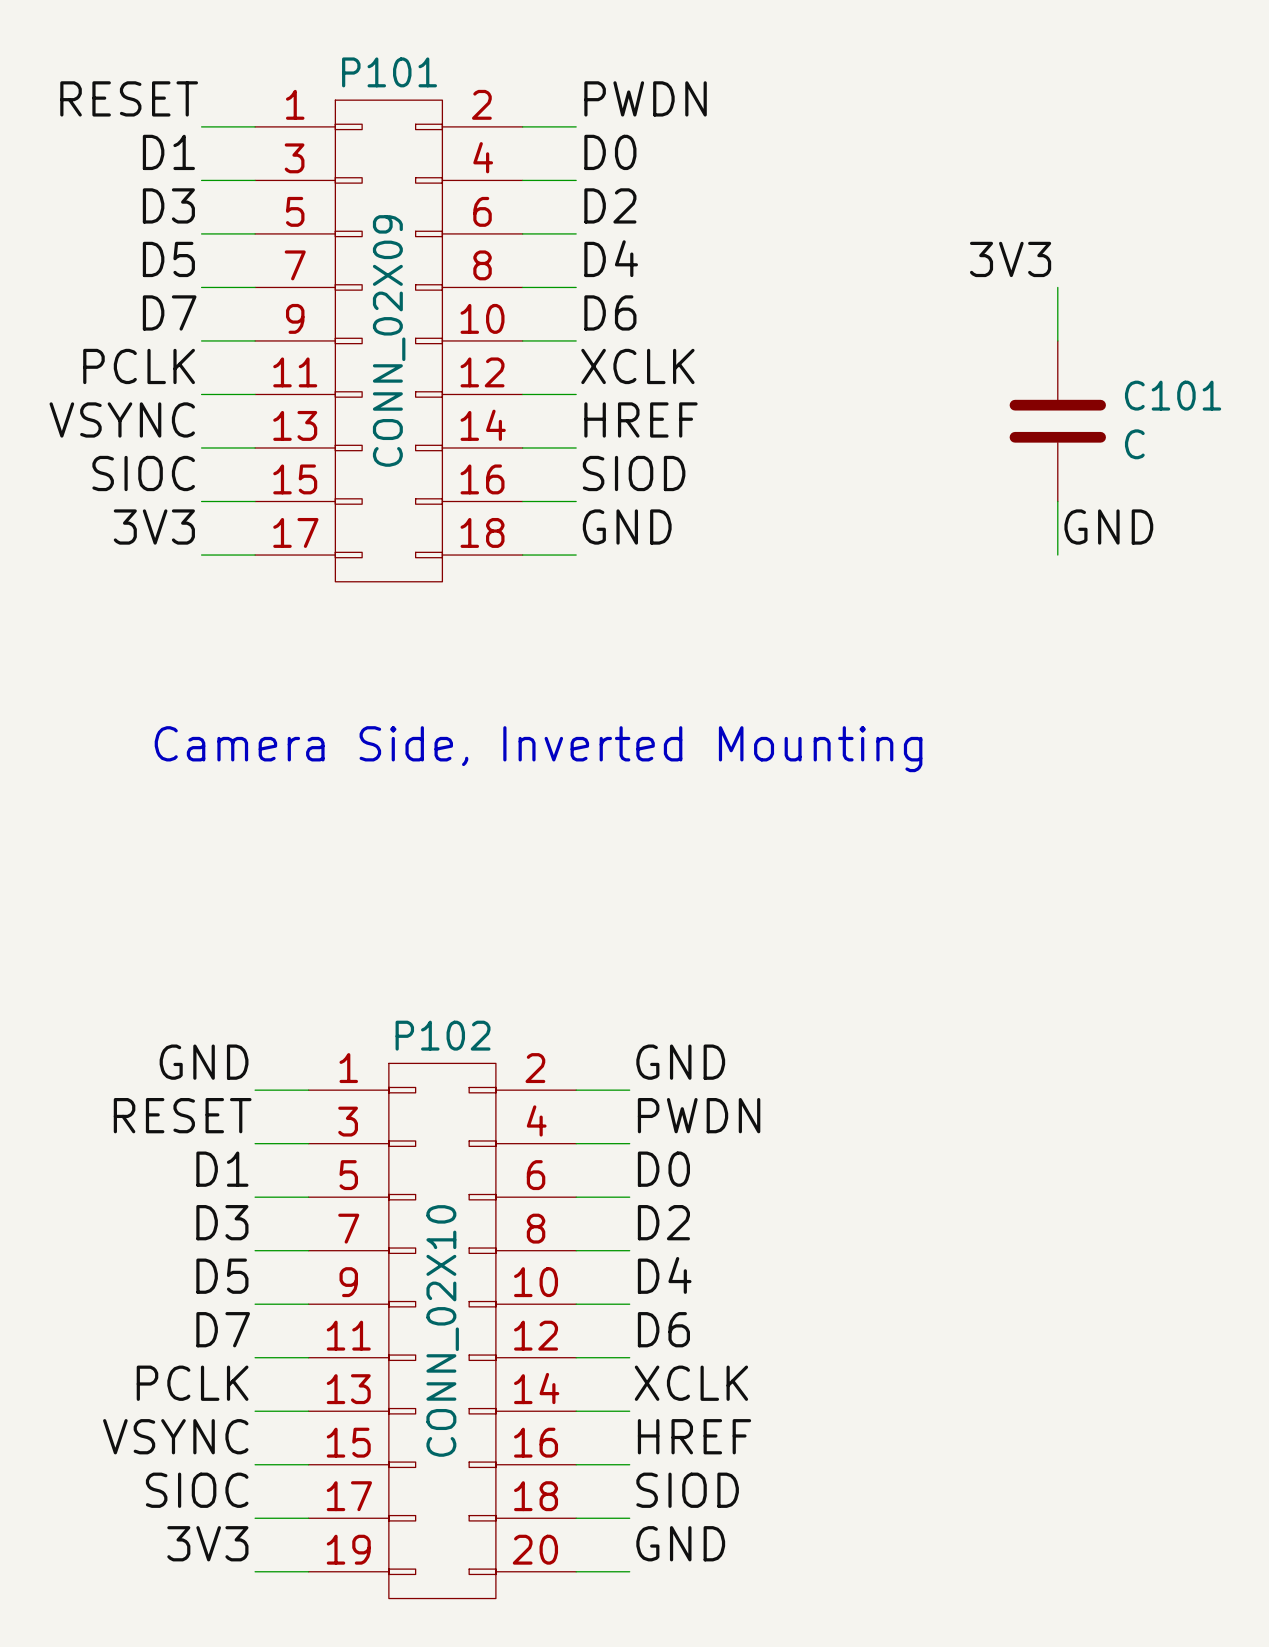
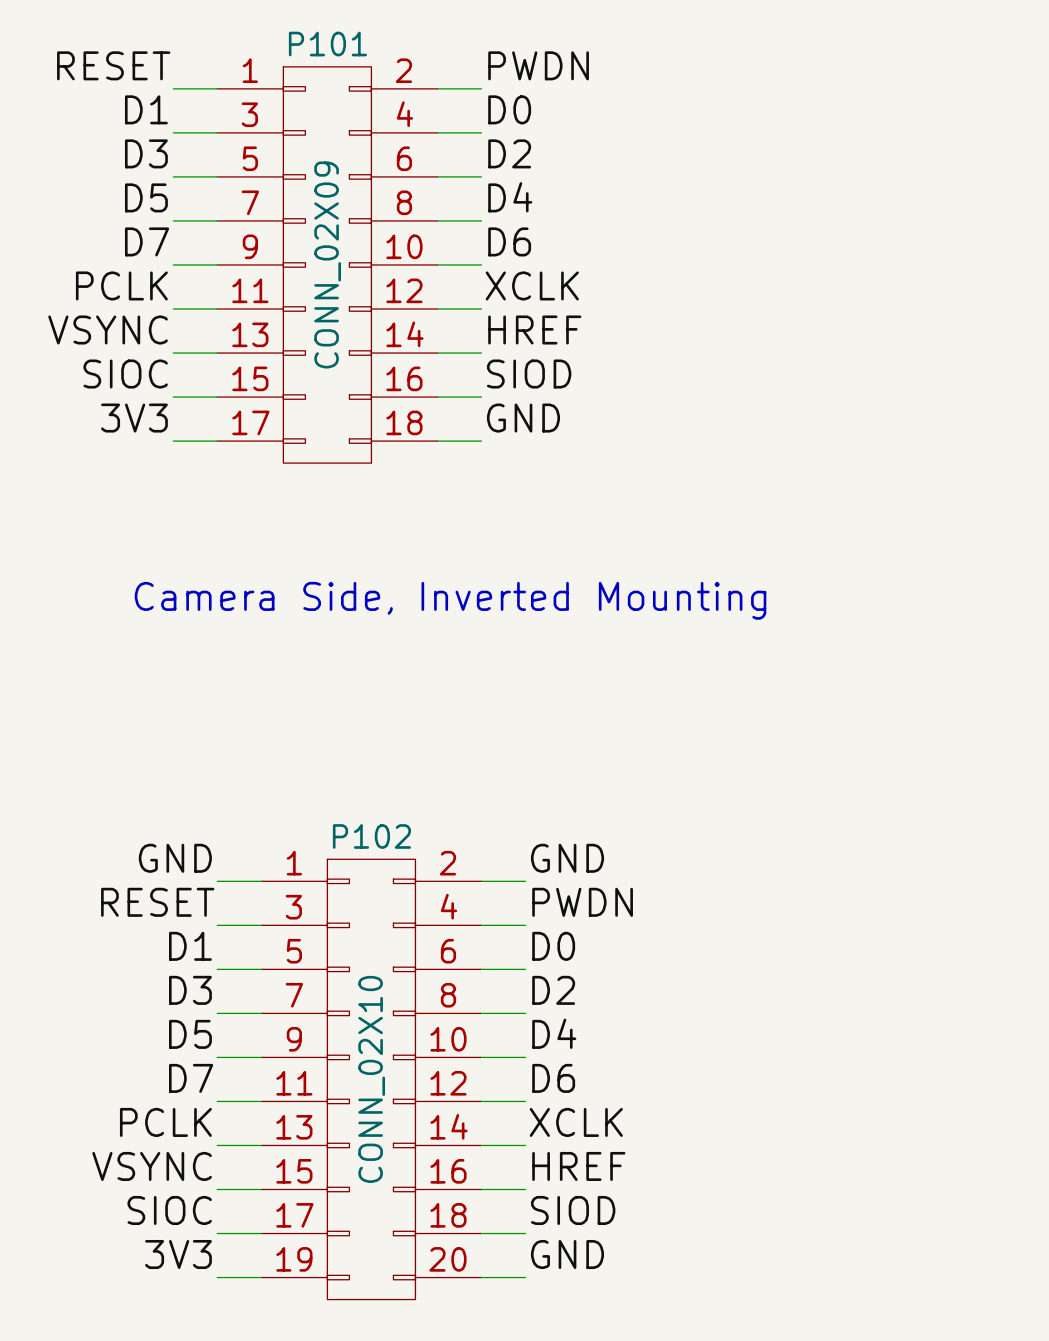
label: 3V3 (1010, 259) -> none
wire: (1057, 287) (1057, 340) -> none
C101: C (1057, 421) -> none
wire: (1057, 501) (1057, 555) -> none
label: GND (1108, 527) -> none

